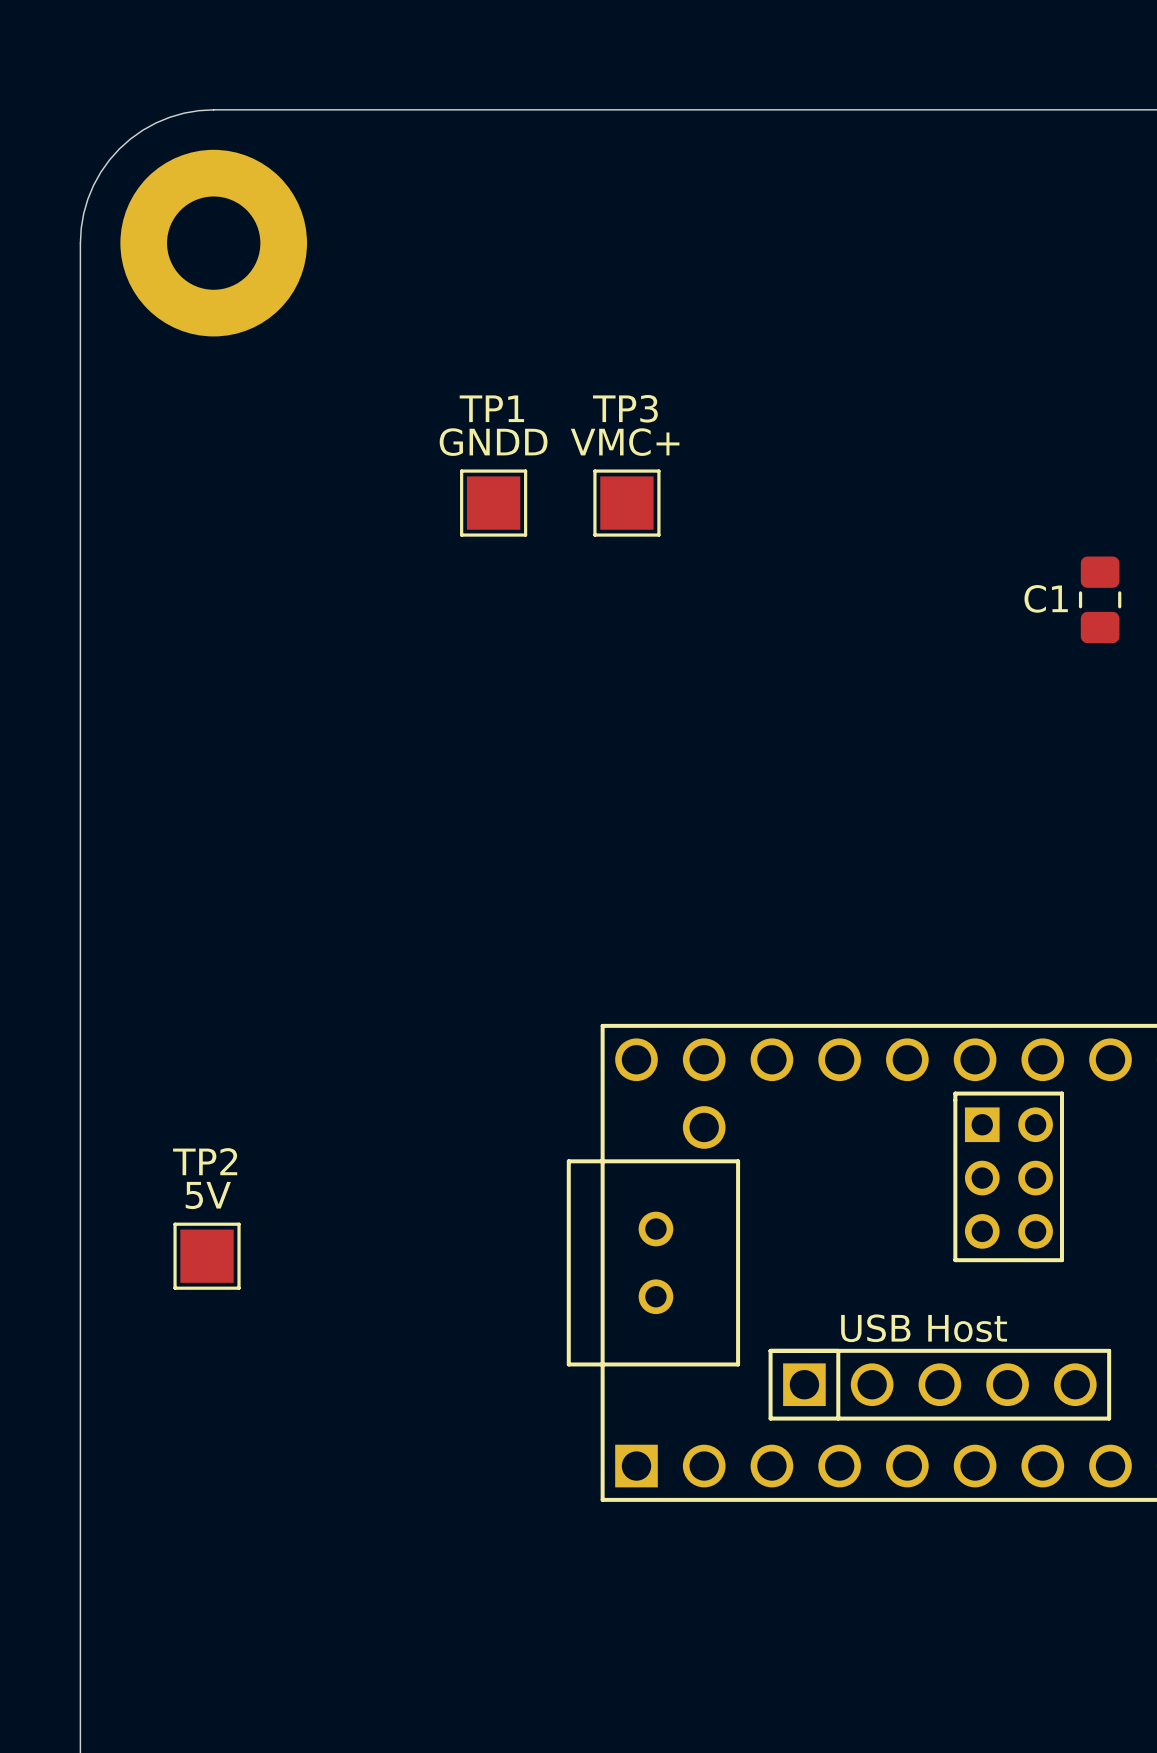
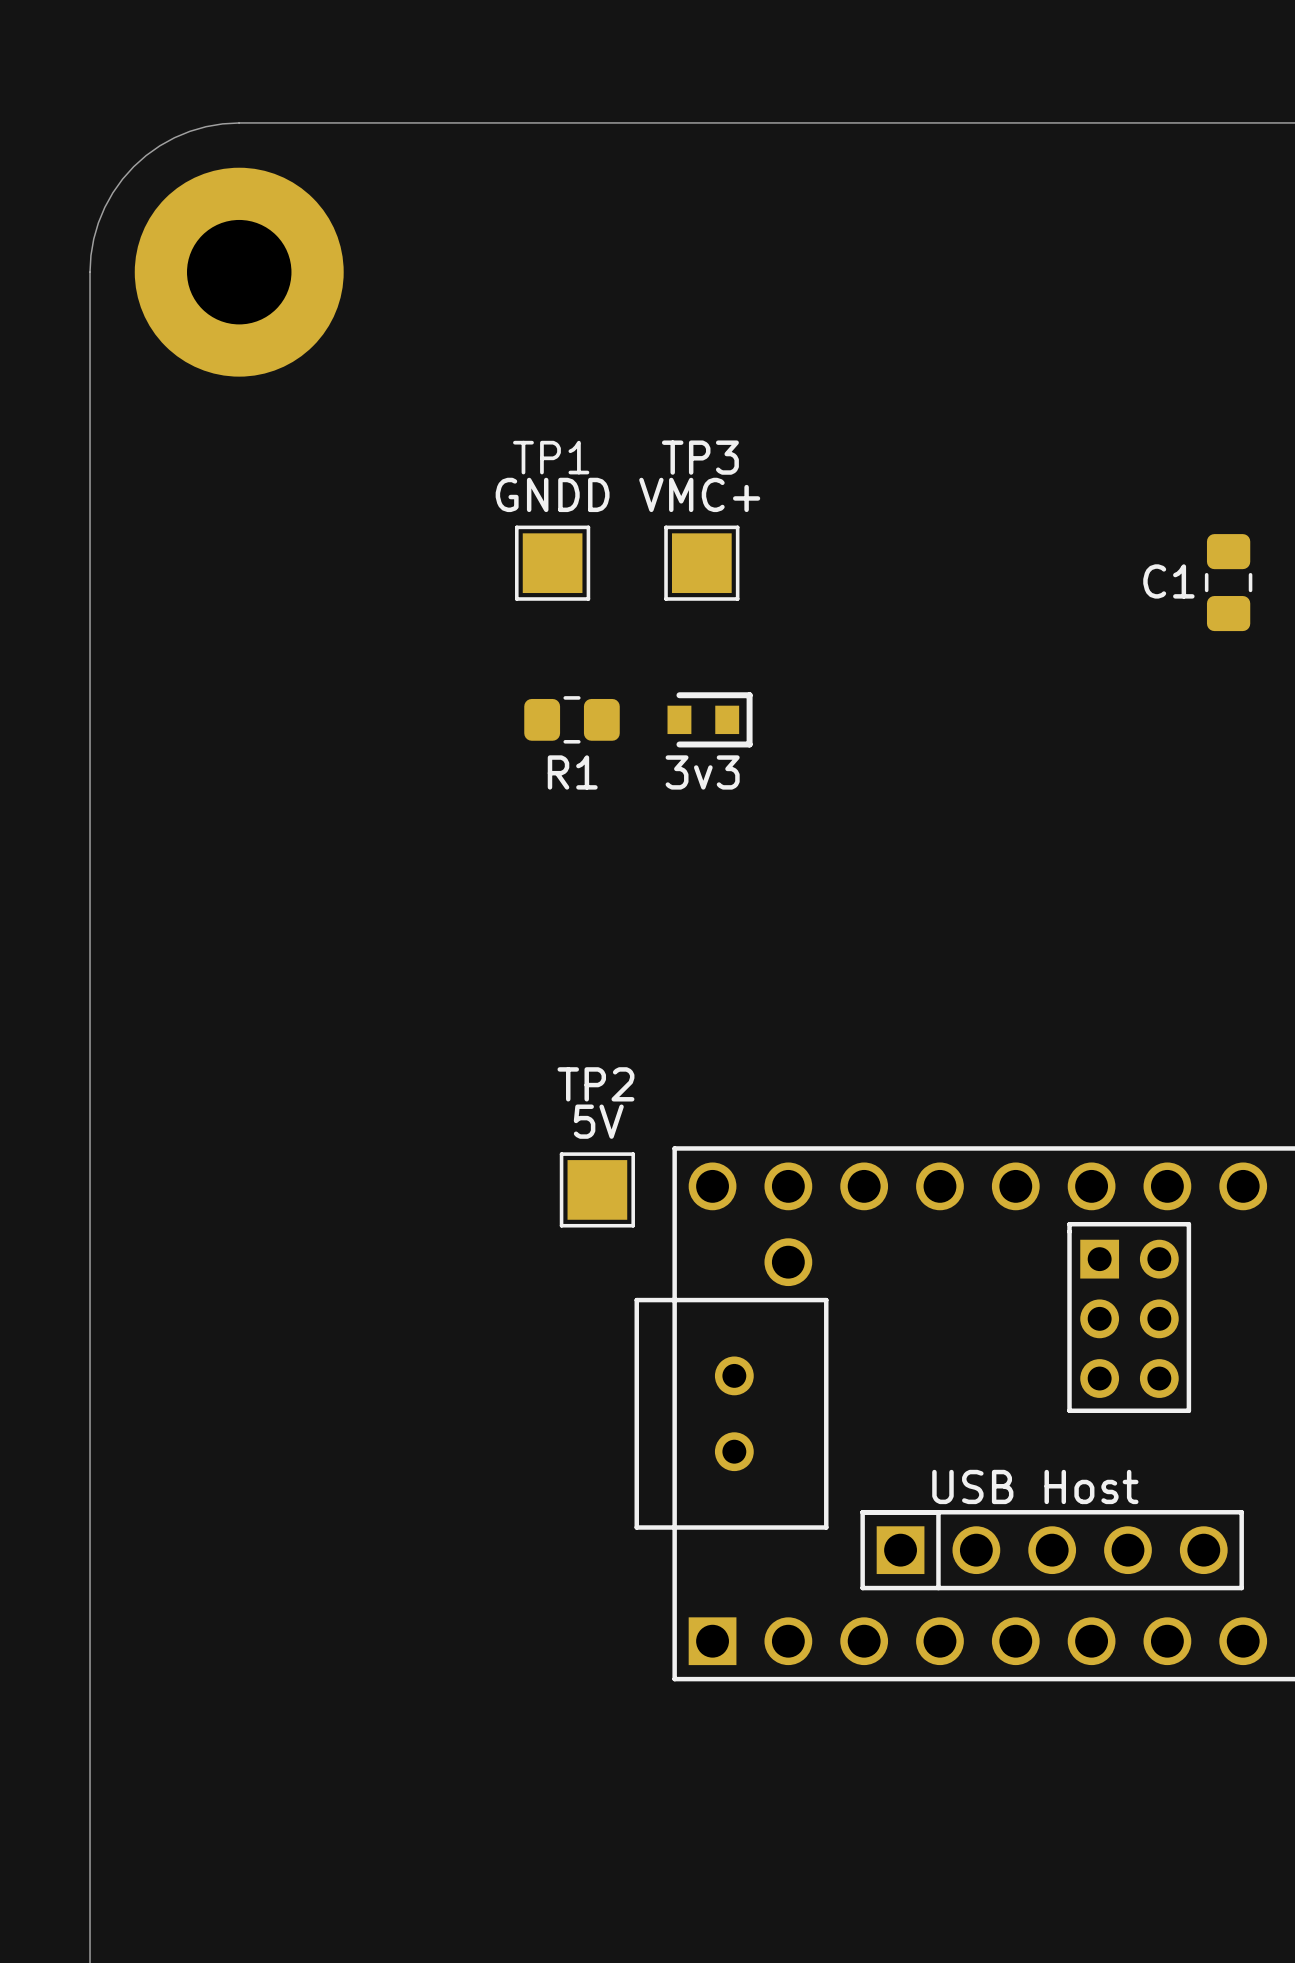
C1 position: (1100, 599) -> (1228, 582)
R1: none -> (572, 719)
3v3: none -> (710, 719)
TP2 position: (207, 1256) -> (597, 1189)

